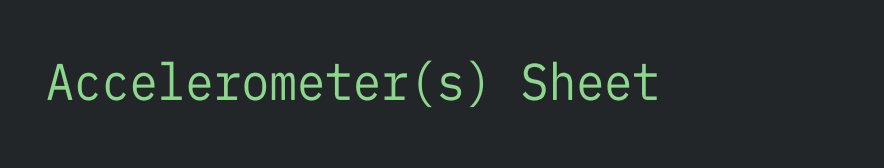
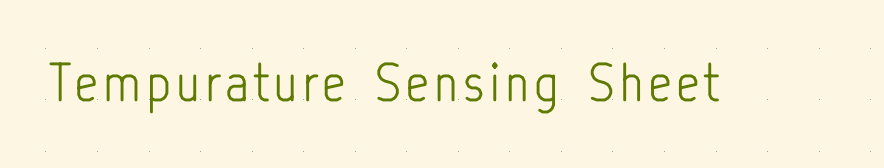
text: Accelerometer(s) Sheet (352, 83) -> Tempurature Sensing Sheet (384, 87)

